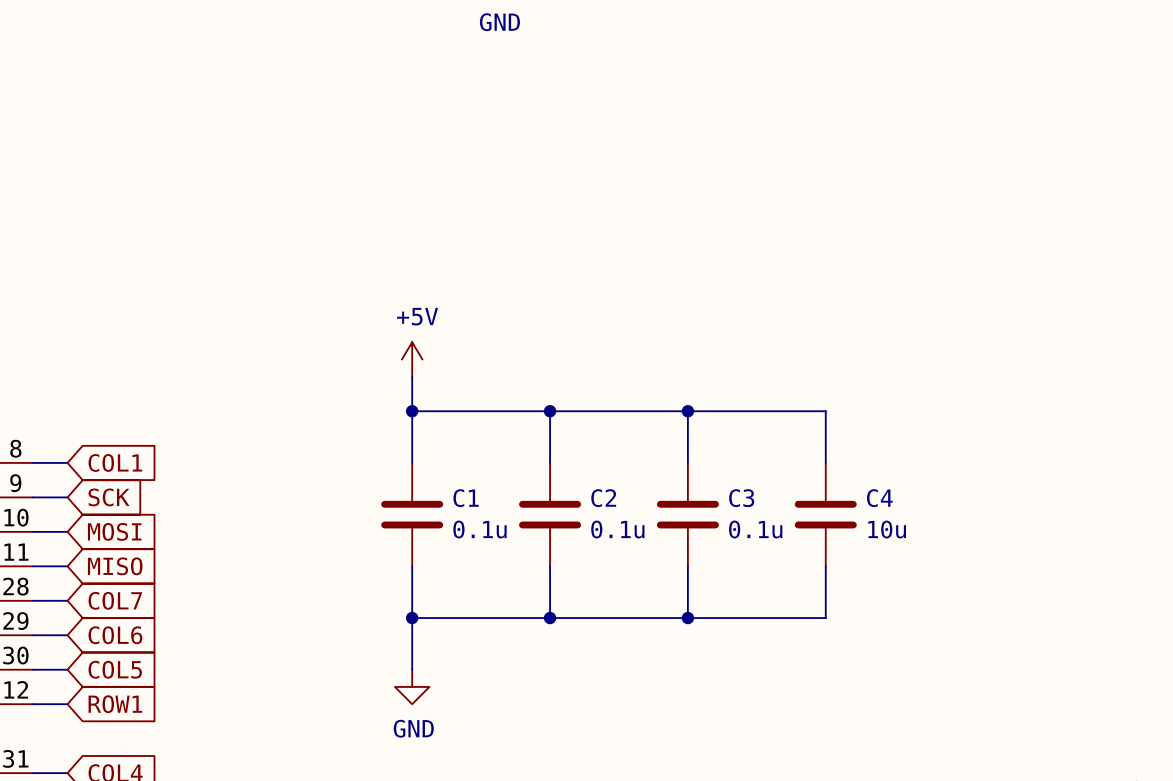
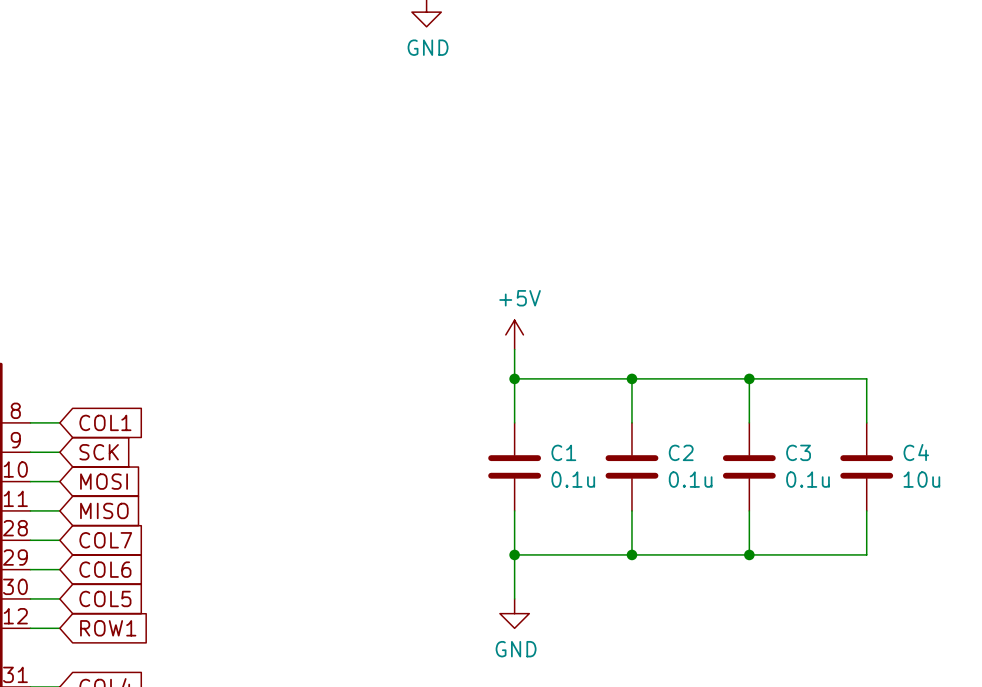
power symbol position: +5V (412, 359) -> +5V (514, 334)
wire: (412, 376) (412, 462) -> (514, 349) (514, 422)
wire: (412, 411) (601, 411) -> none
junction: (412, 411) -> none
wire: (550, 411) (550, 462) -> (631, 378) (631, 422)
junction: (550, 411) -> none
junction: none -> (514, 378)
wire: (687, 411) (687, 462) -> (749, 378) (749, 422)
junction: (687, 411) -> none
junction: none -> (631, 378)
wire: (825, 411) (825, 462) -> (705, 378) (866, 378) (866, 422)
junction: none -> (749, 378)
C1 position: (412, 514) -> (514, 466)
C2 position: (550, 514) -> (631, 466)
C3 position: (687, 514) -> (749, 466)
C4 position: (825, 514) -> (866, 466)
wire: (412, 566) (412, 669) -> (514, 510) (514, 598)
wire: (550, 566) (550, 618) -> (631, 510) (631, 554)
wire: (687, 566) (687, 618) -> (749, 510) (749, 554)
wire: (825, 566) (825, 618) -> (866, 510) (866, 554) (705, 554)
wire: (412, 618) (601, 618) -> none
junction: (412, 618) -> none
junction: (550, 618) -> none
junction: none -> (514, 554)
junction: (687, 618) -> none
junction: none -> (631, 554)
junction: none -> (749, 554)
power symbol position: GND (412, 686) -> GND (514, 613)

